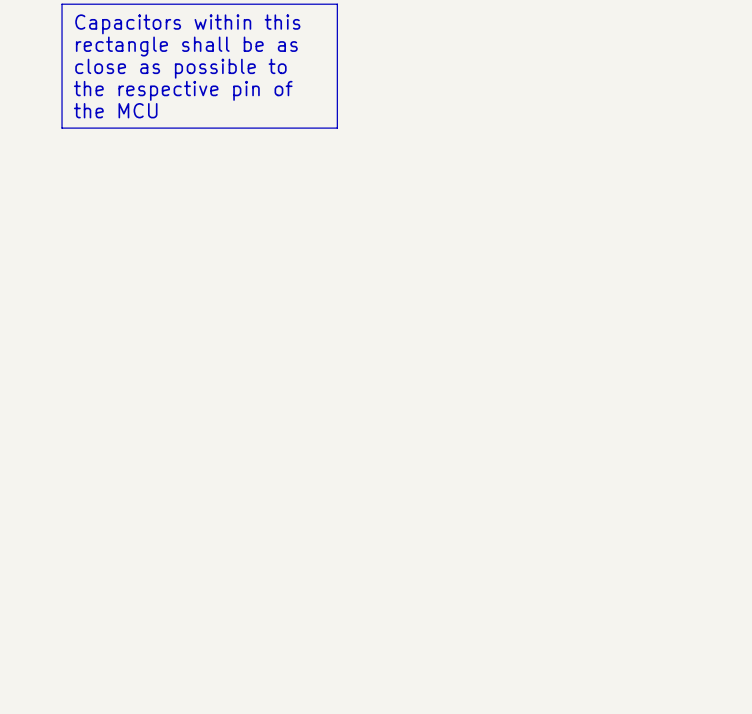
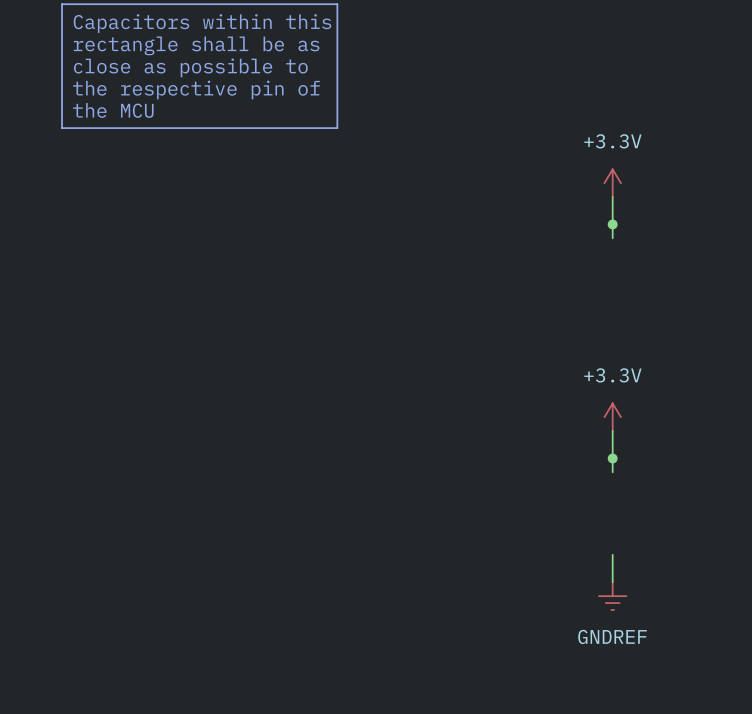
power symbol: none -> +3.3V (612, 183)
wire: none -> (612, 196) (612, 238)
junction: none -> (612, 224)
power symbol: none -> +3.3V (612, 417)
wire: none -> (612, 430) (612, 472)
junction: none -> (612, 458)
wire: none -> (612, 554) (612, 582)
power symbol: none -> GNDREF (612, 596)

